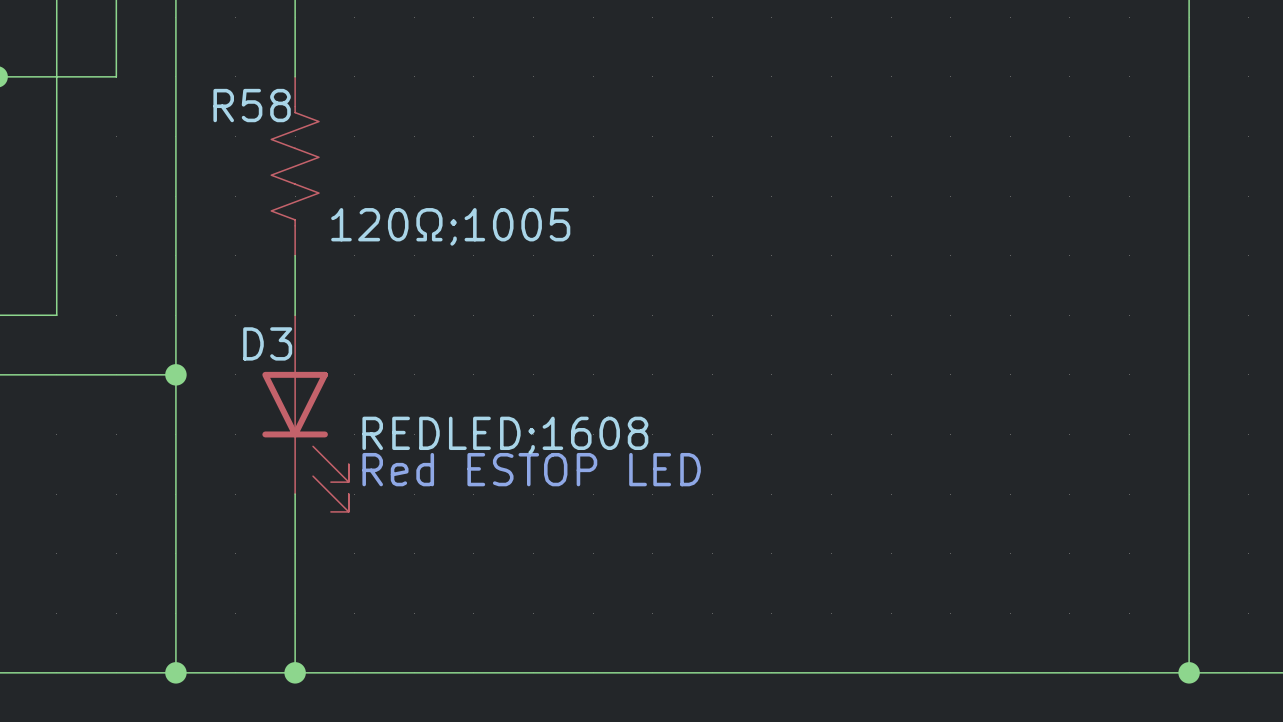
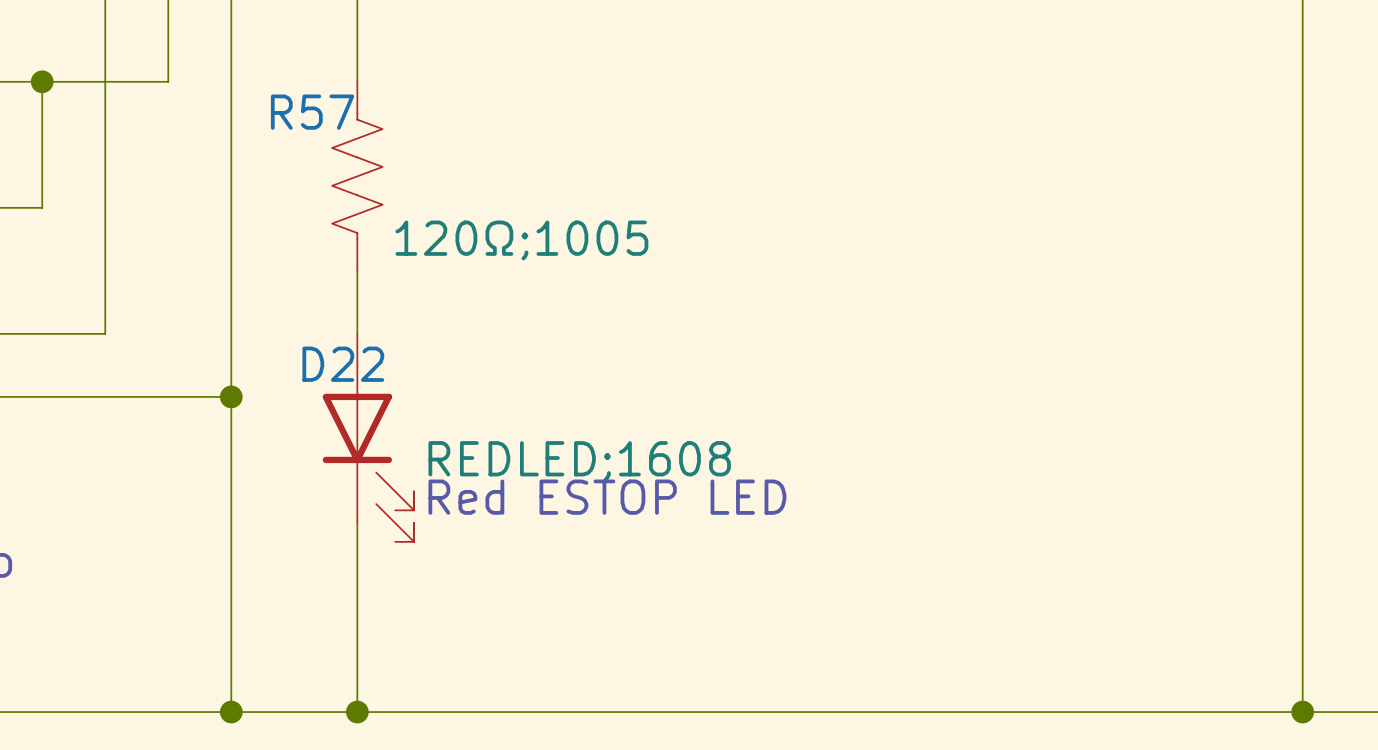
R58 name: R58 (252, 105) -> R57 (312, 112)
D3 name: D3 (267, 343) -> D22 (343, 364)

